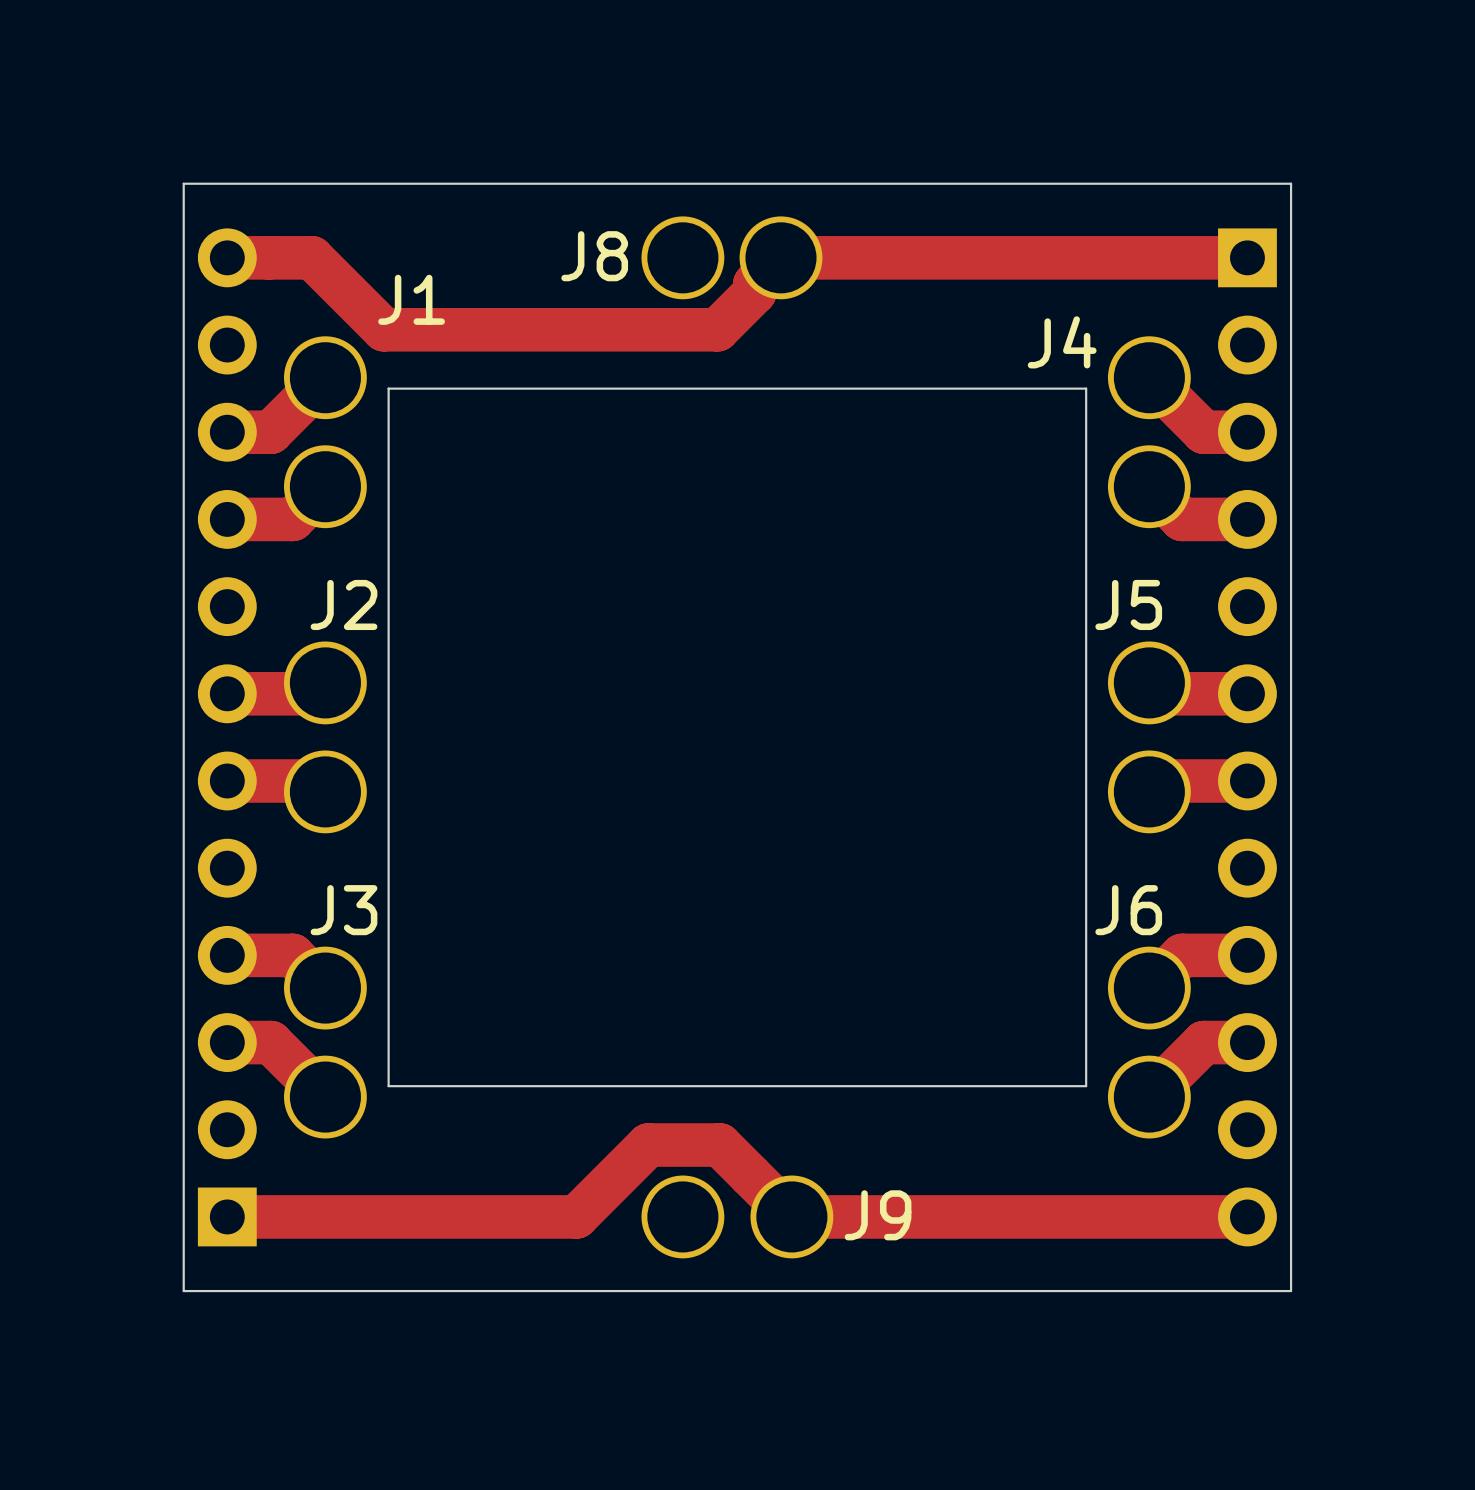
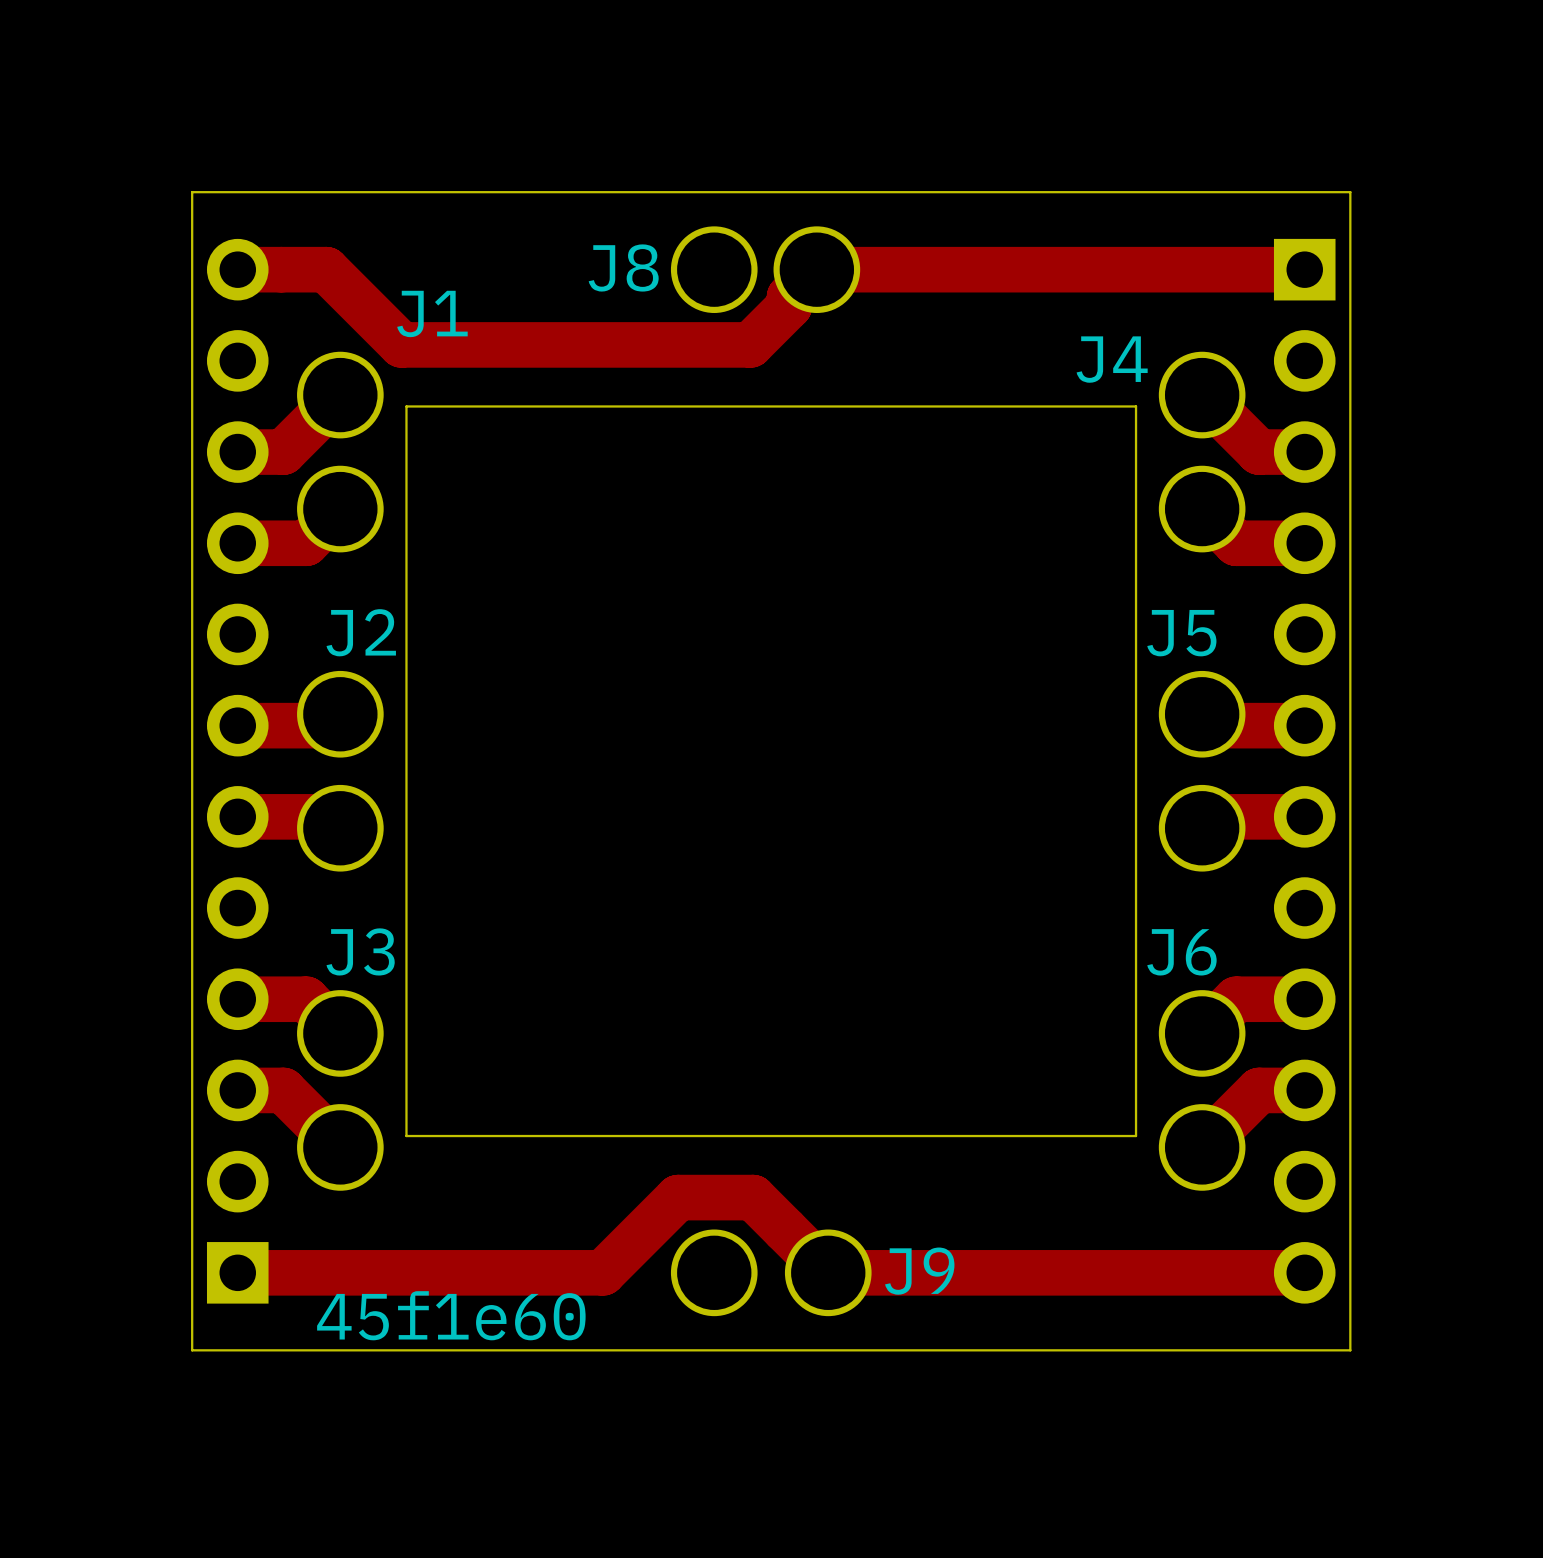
text: none -> 45f1e60 (451, 1315)

